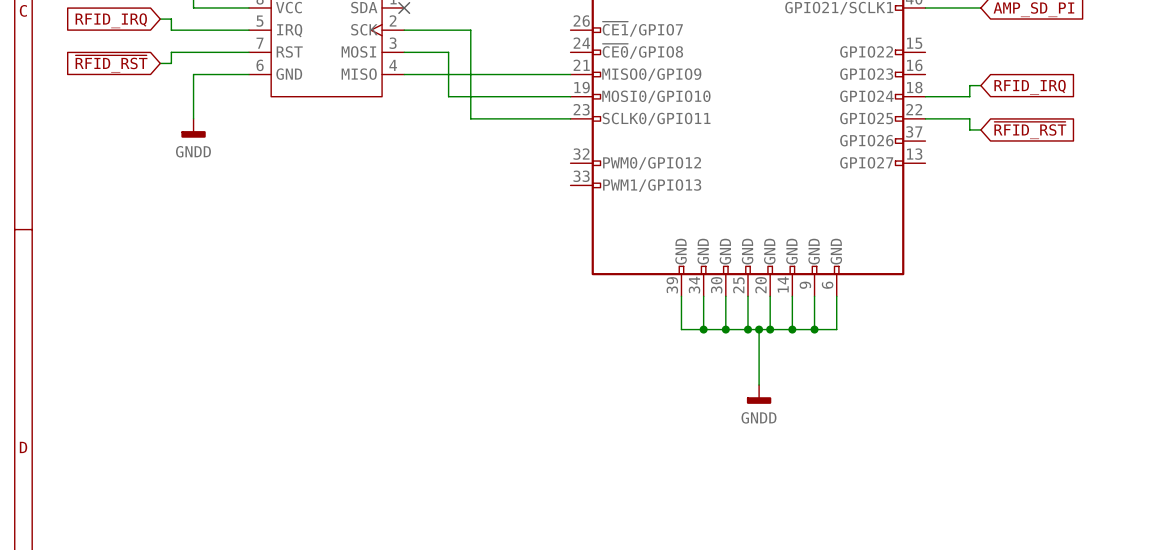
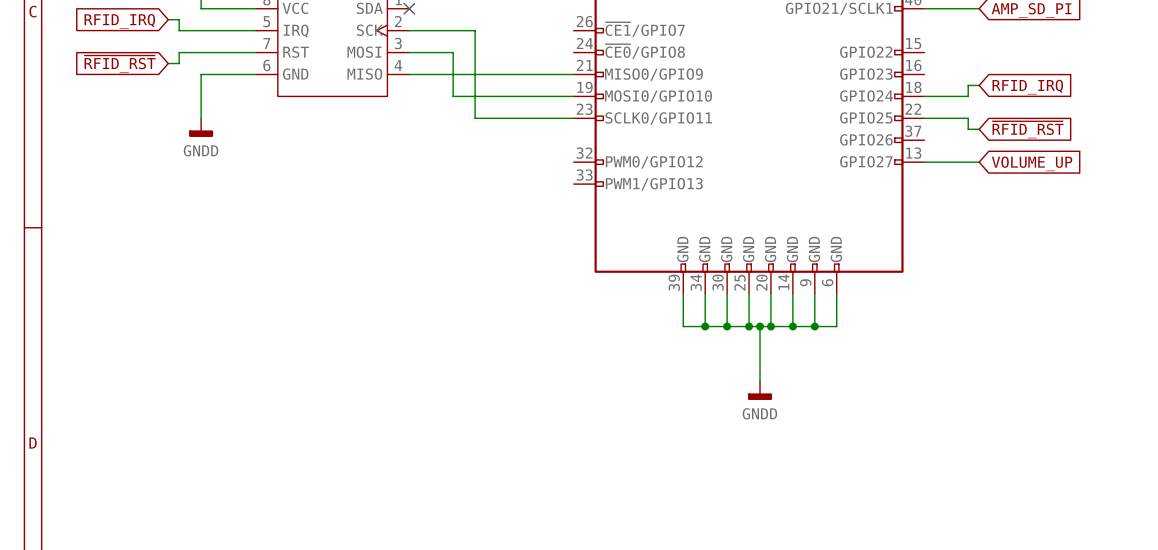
wire: none -> (924, 162) (979, 162)
global label: none -> VOLUME_UP (1032, 163)

